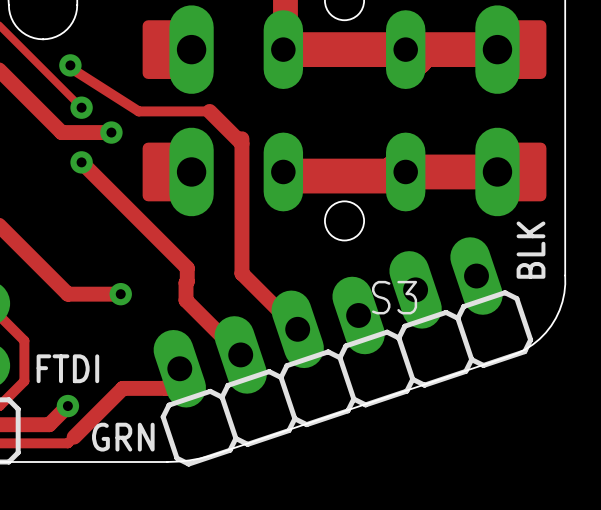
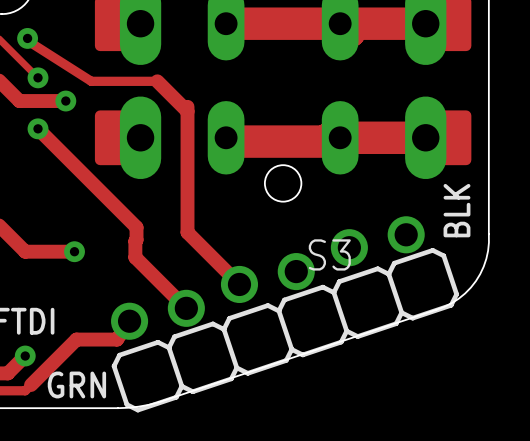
part footprint: [153, 237, 534, 467] -> [111, 216, 459, 413]

